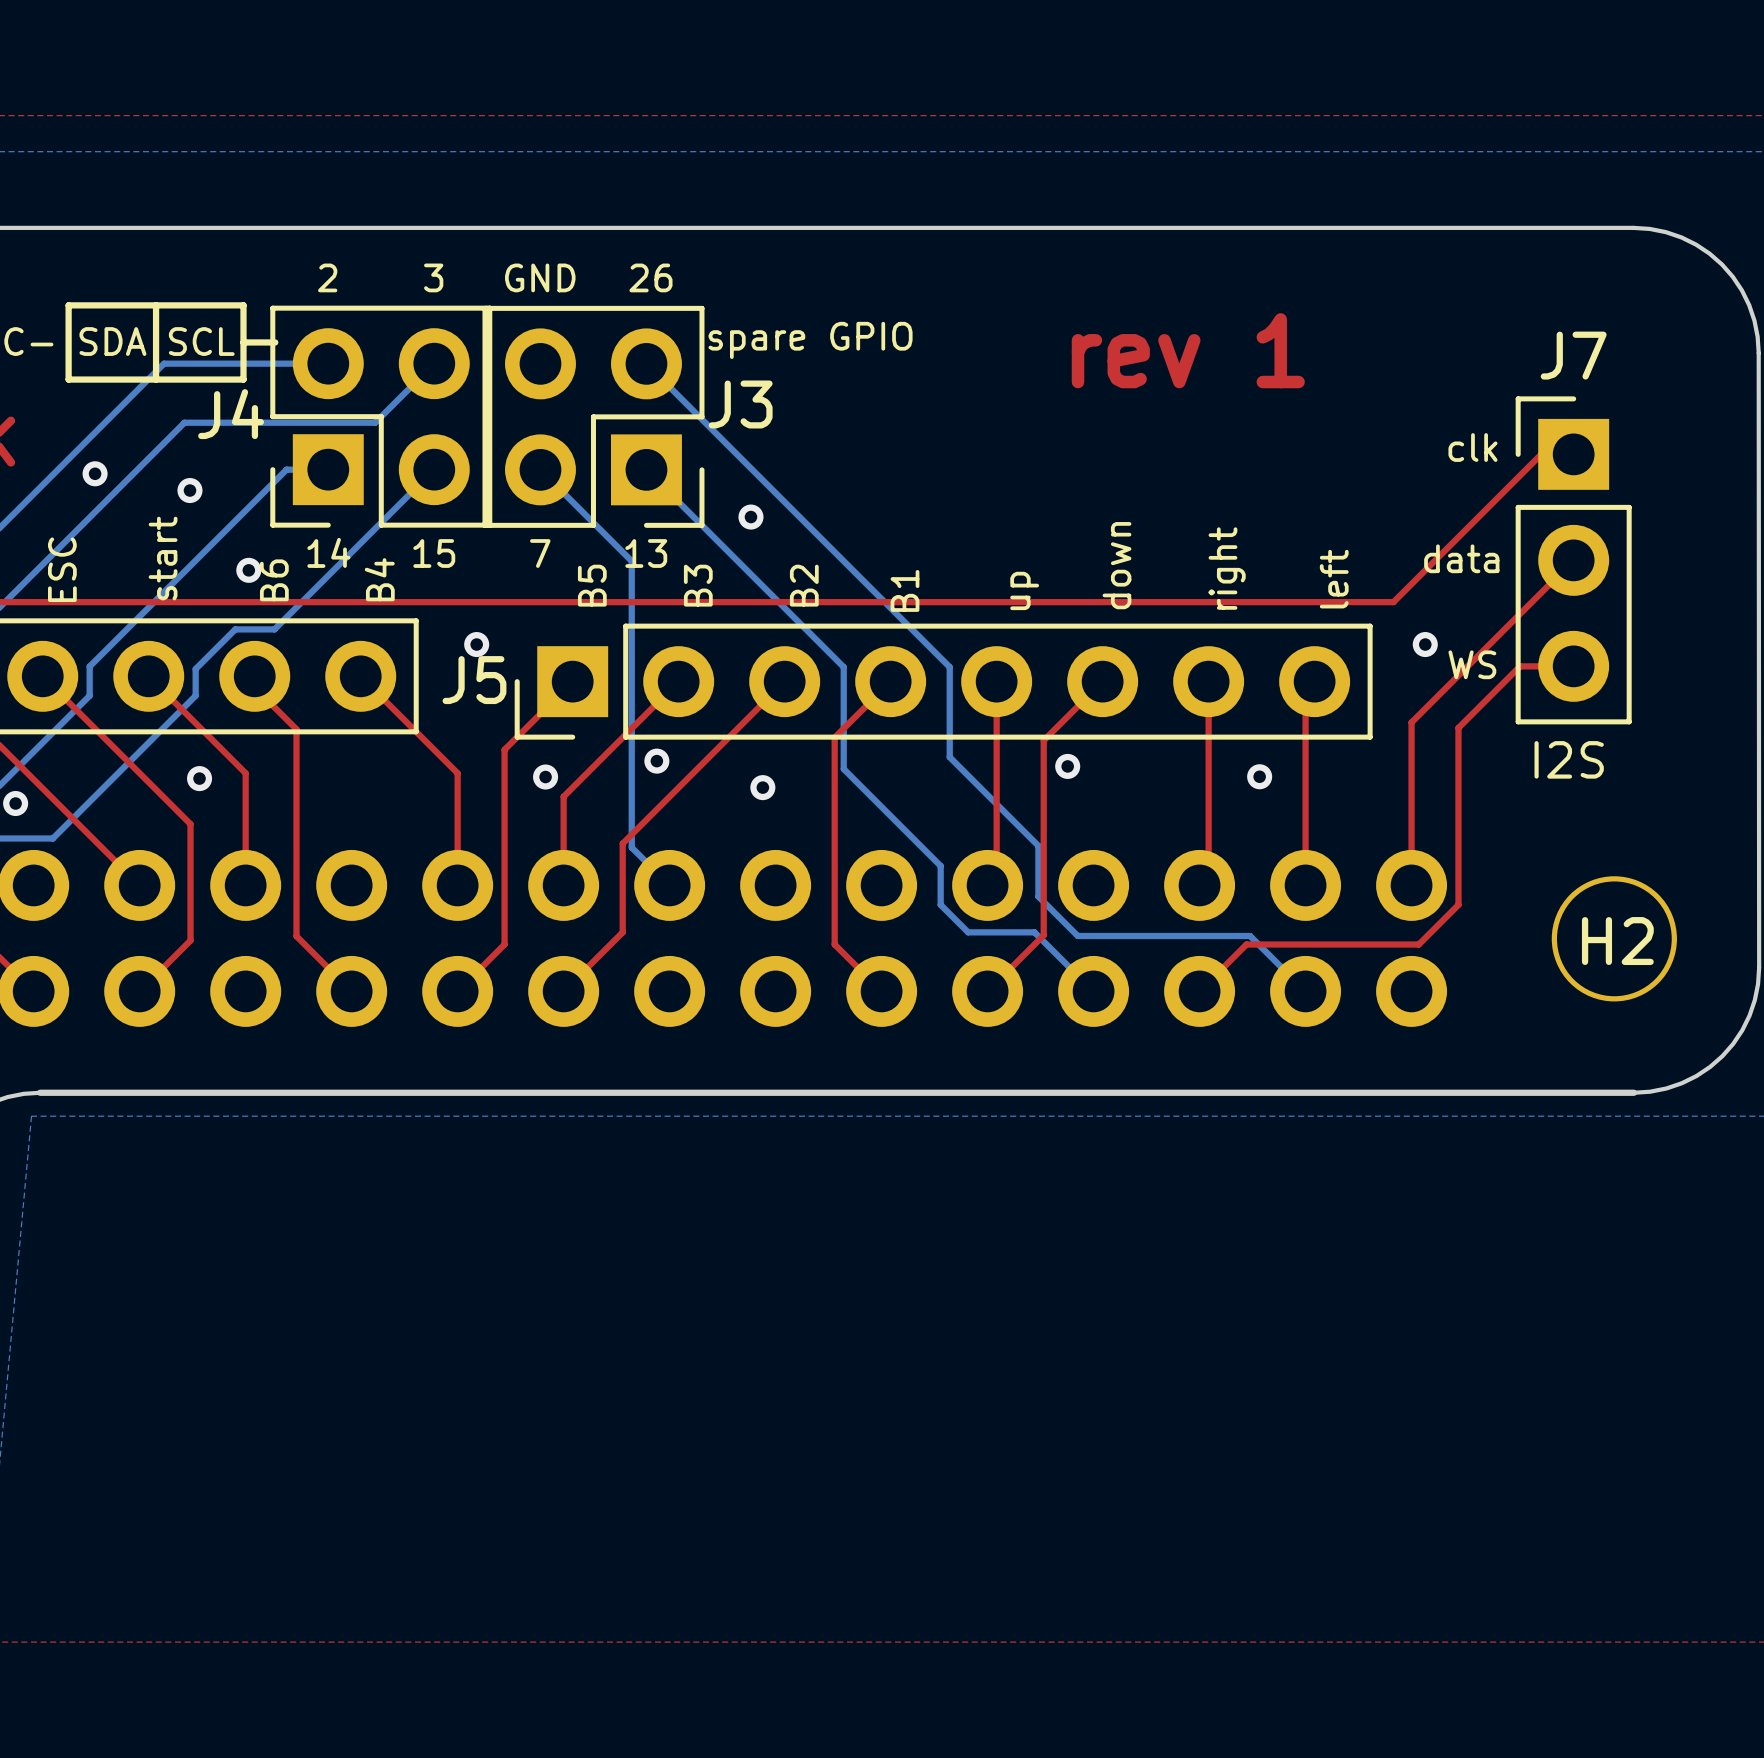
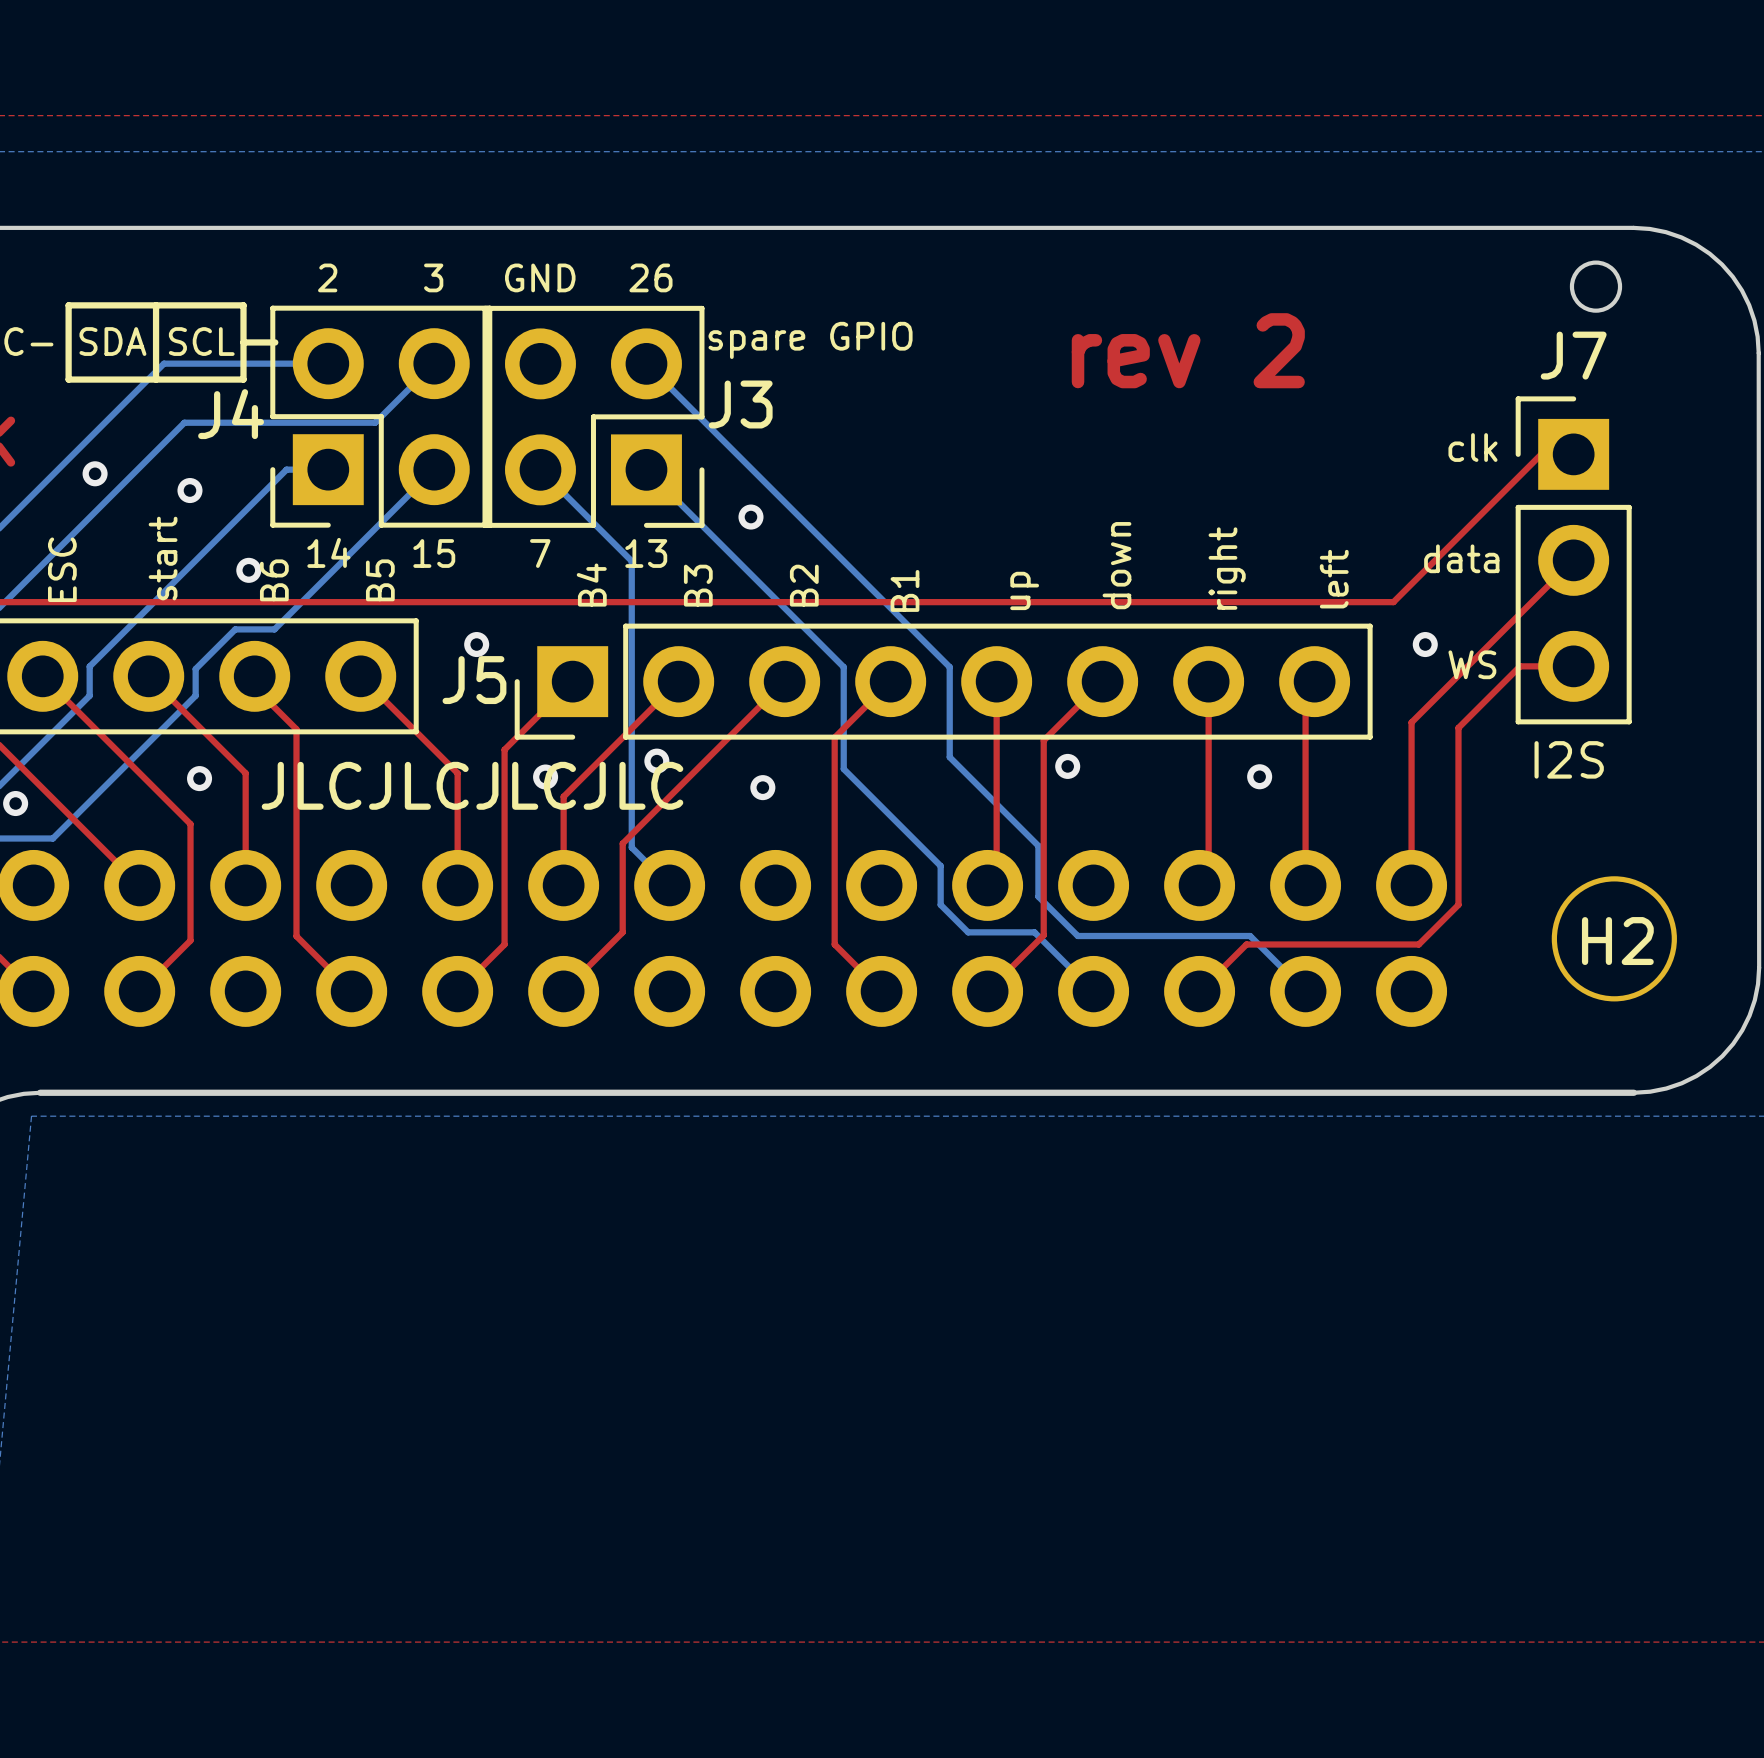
round board edge: none -> [1569, 260, 1623, 313]
text: rev 1 (1188, 350) -> rev 2 (1188, 350)
text: B4 (379, 579) -> B5 (380, 580)
text: B5 (592, 585) -> B4 (591, 585)
text: none -> JLCJLCJLCJLC (472, 785)

